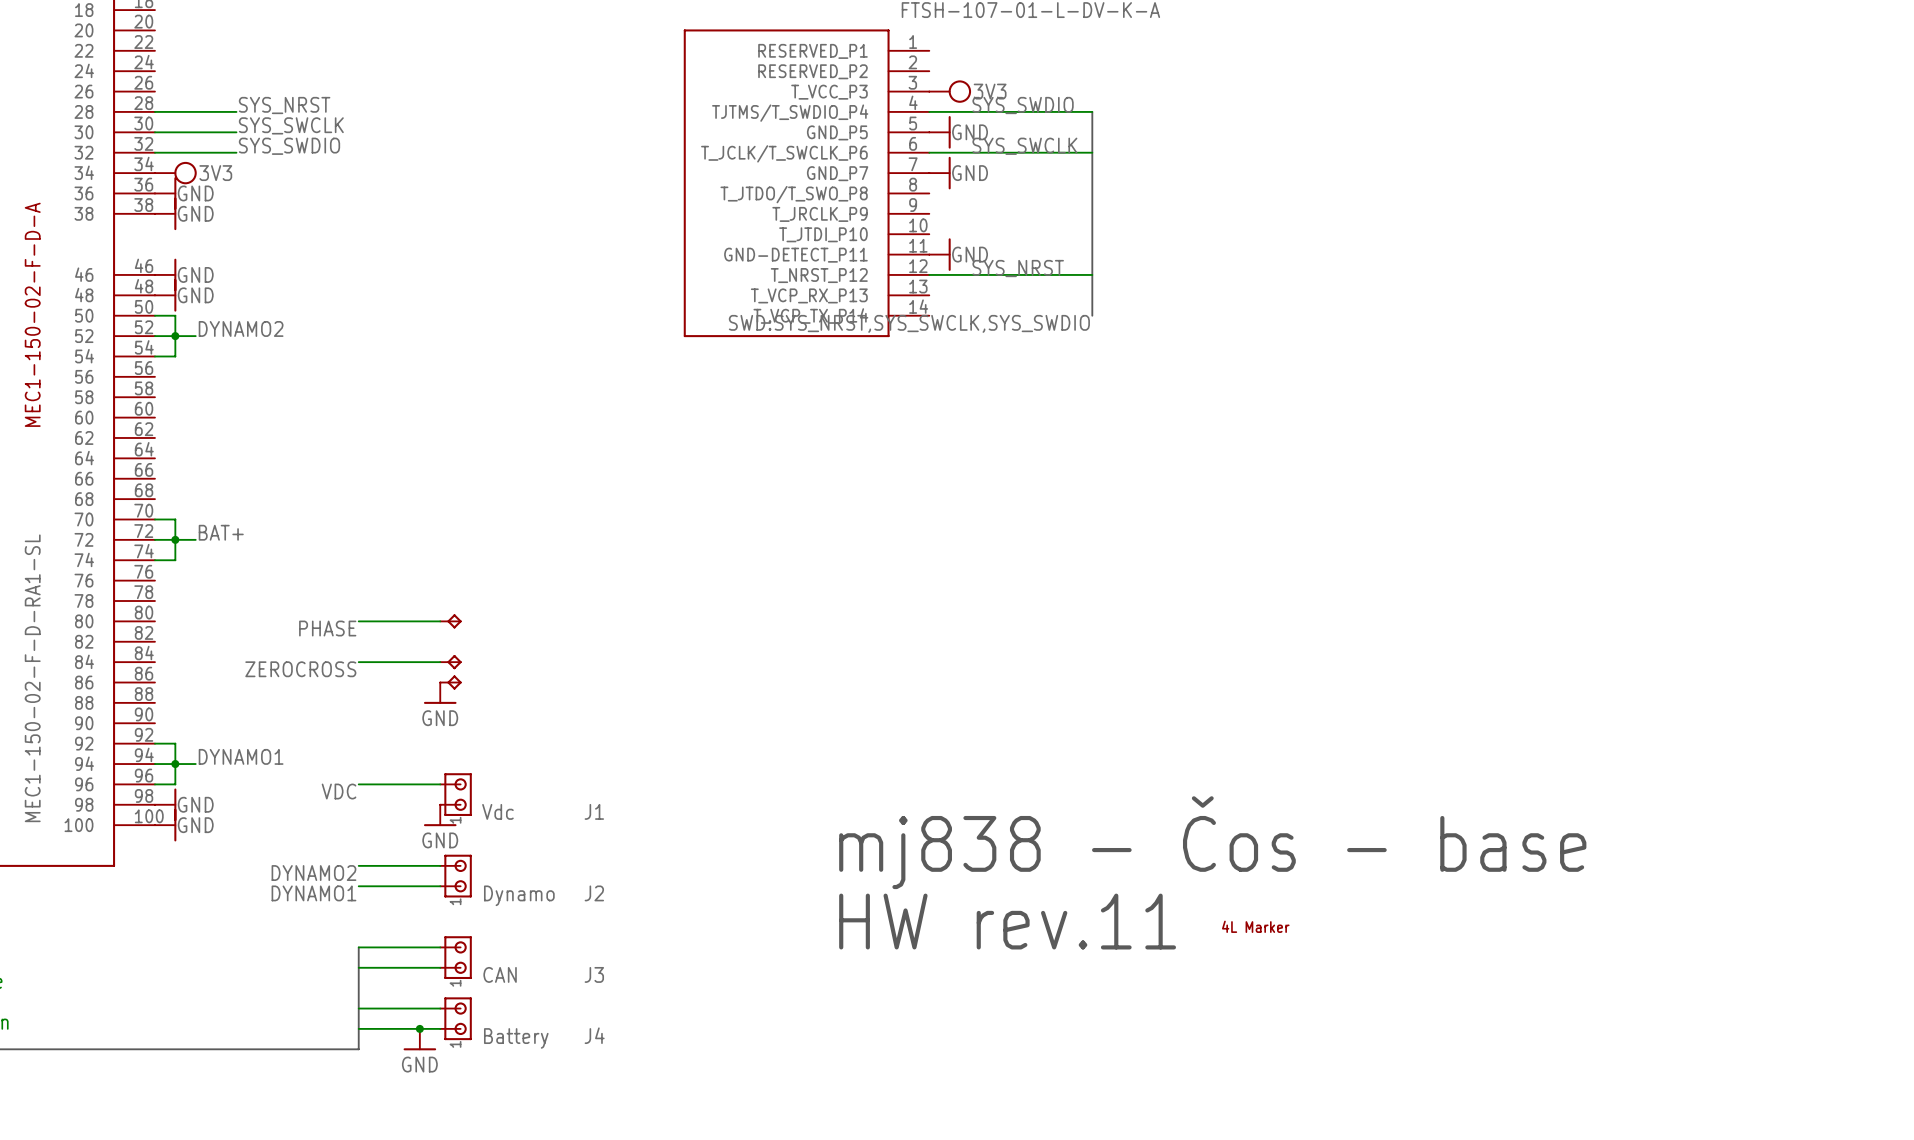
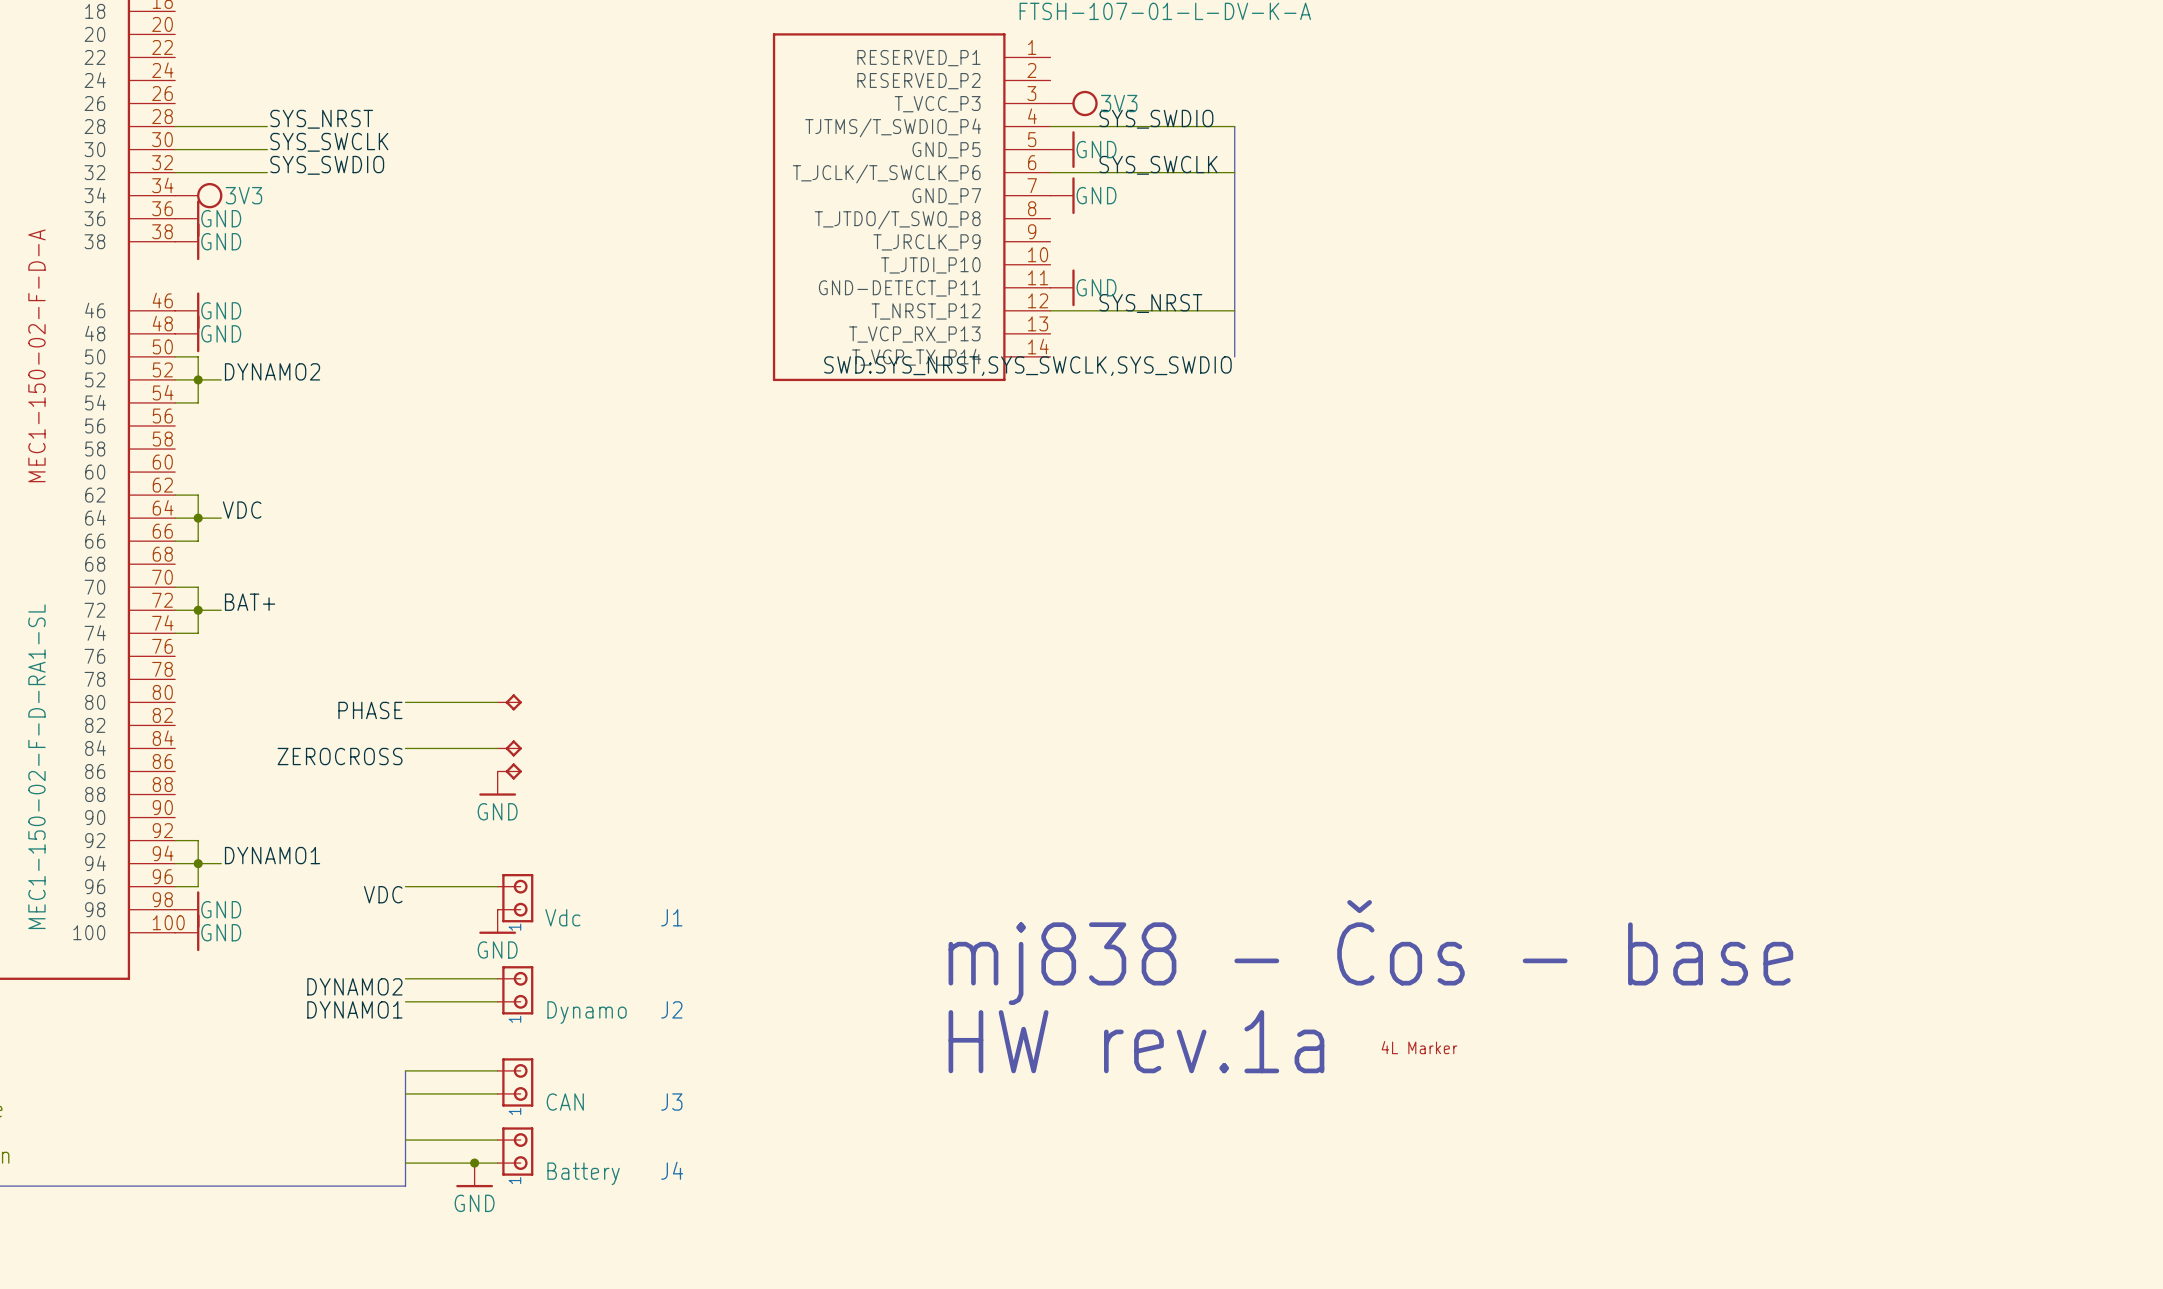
wire: none -> (175, 495) (198, 495) (198, 541) (175, 541)
label: none -> VDC (242, 510)
wire: none -> (175, 518) (221, 518)
junction: none -> (198, 518)
text: HW rev.11 (1007, 921) -> HW rev.1a (1136, 1041)

